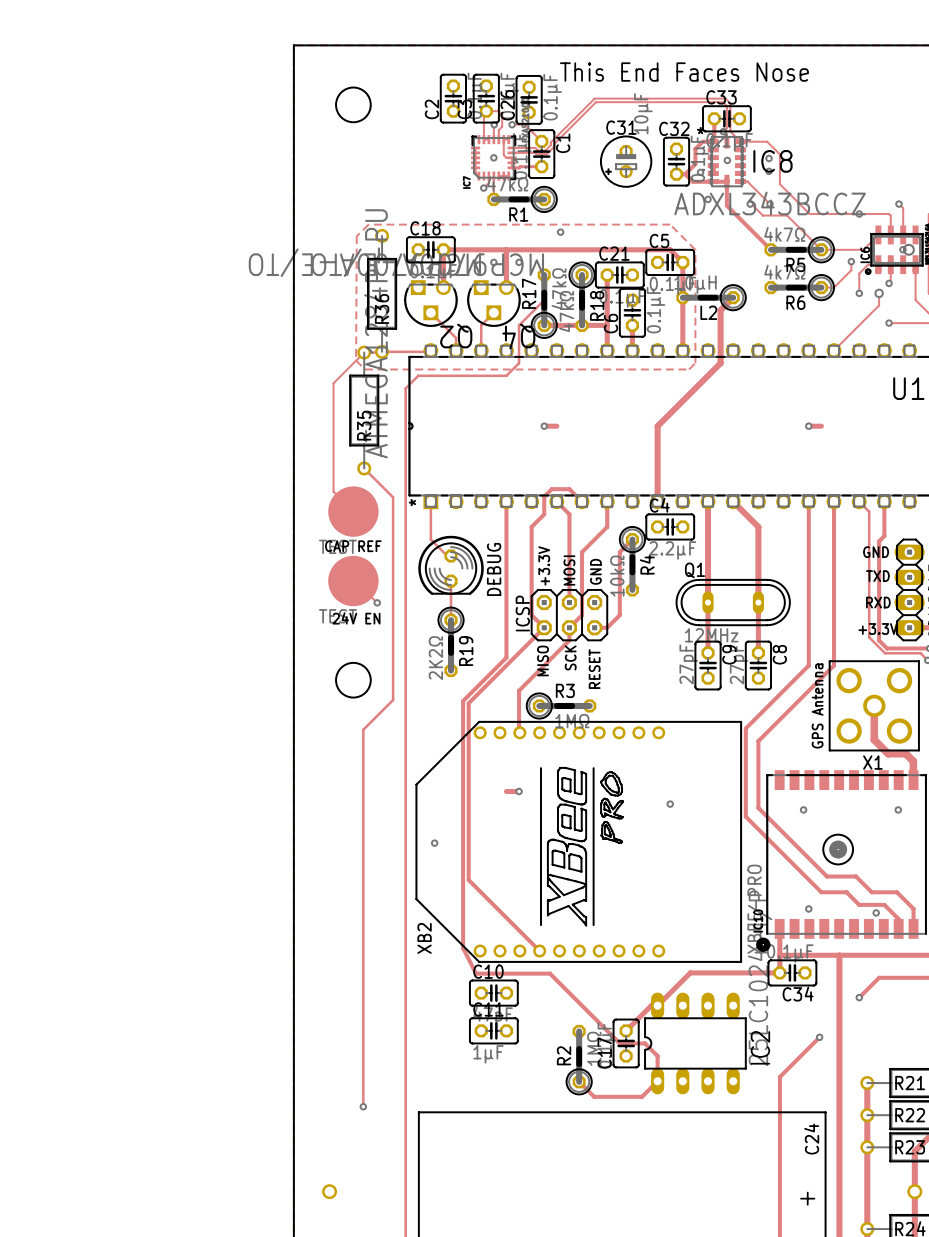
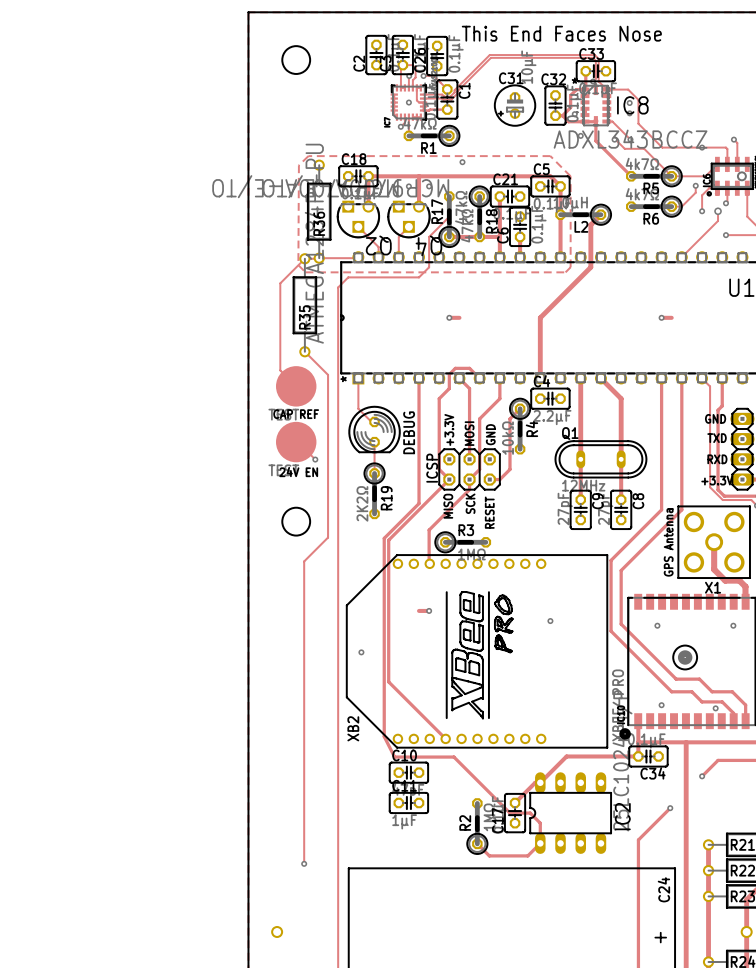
via: (727, 160) -> none
via: (902, 249) -> none

